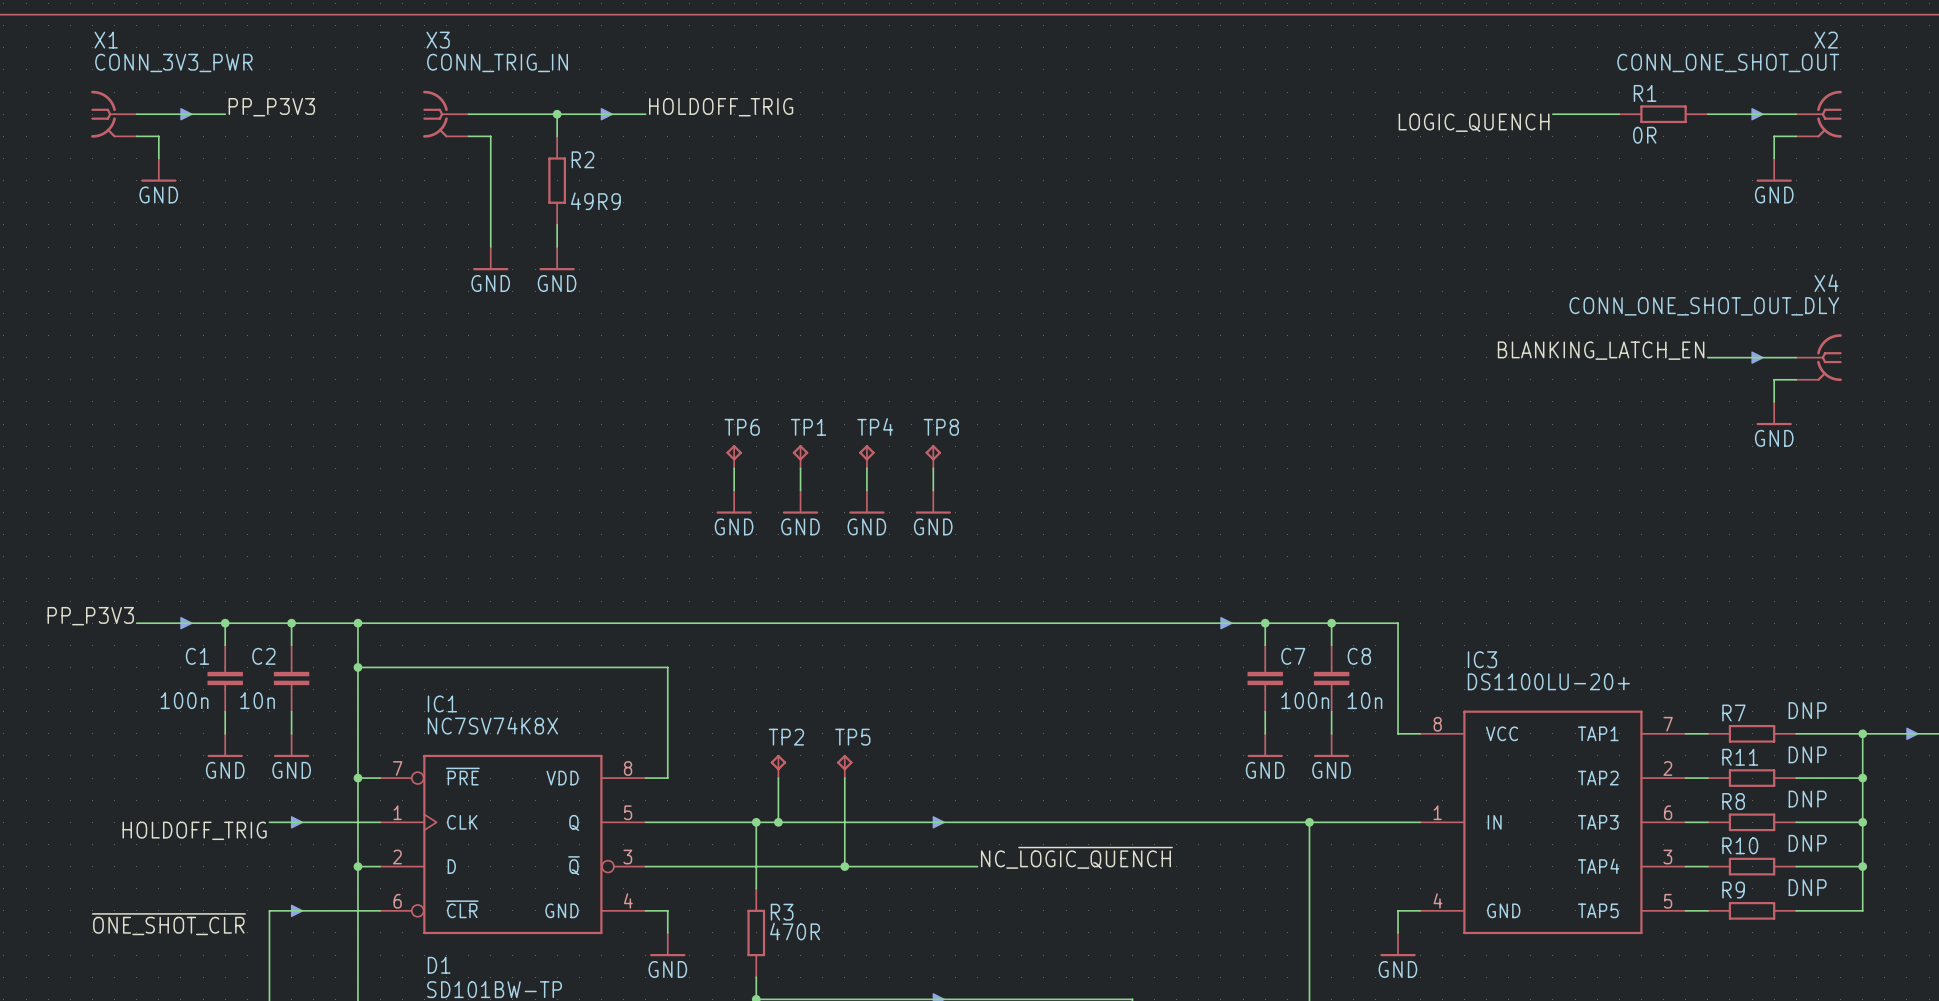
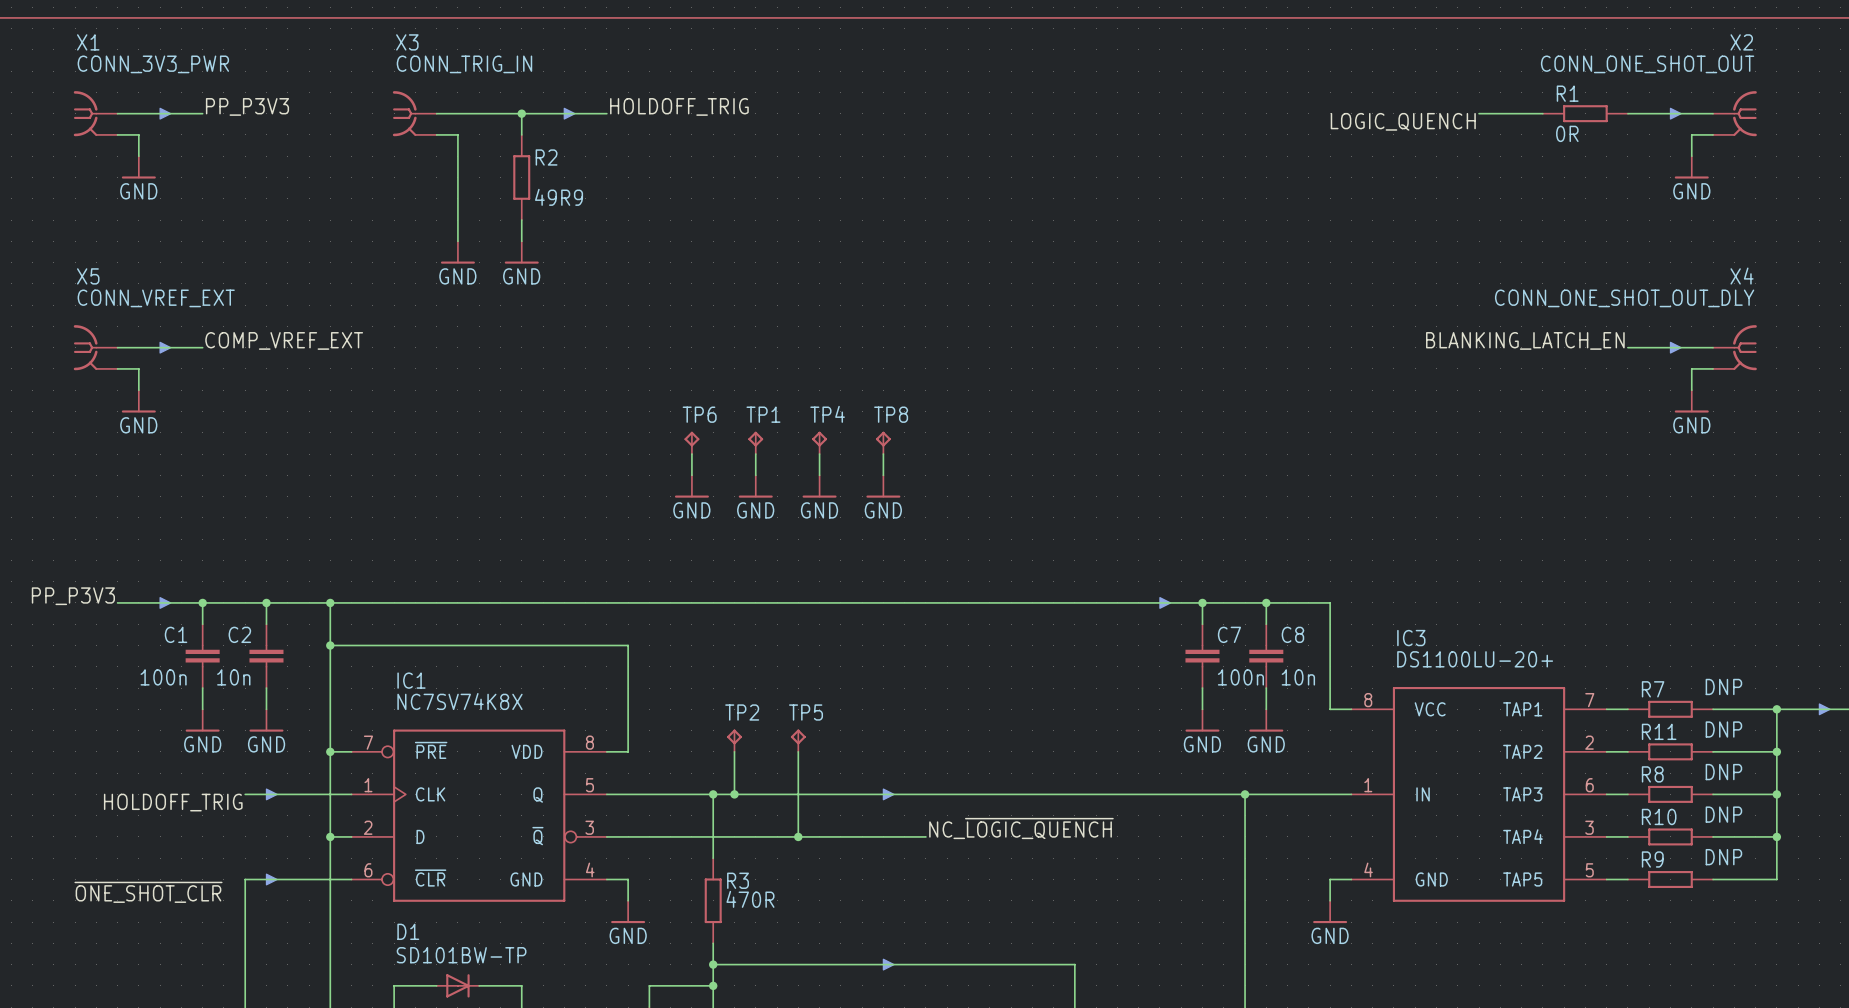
label: none -> COMP_VREF_EXT (284, 340)
X5: none -> CONN_VREF_EXT (95, 347)
wire: none -> (117, 347) (202, 347)
part: none -> (165, 347)
wire: none -> (117, 368) (138, 368) (138, 390)
power symbol: none -> GND (138, 401)

